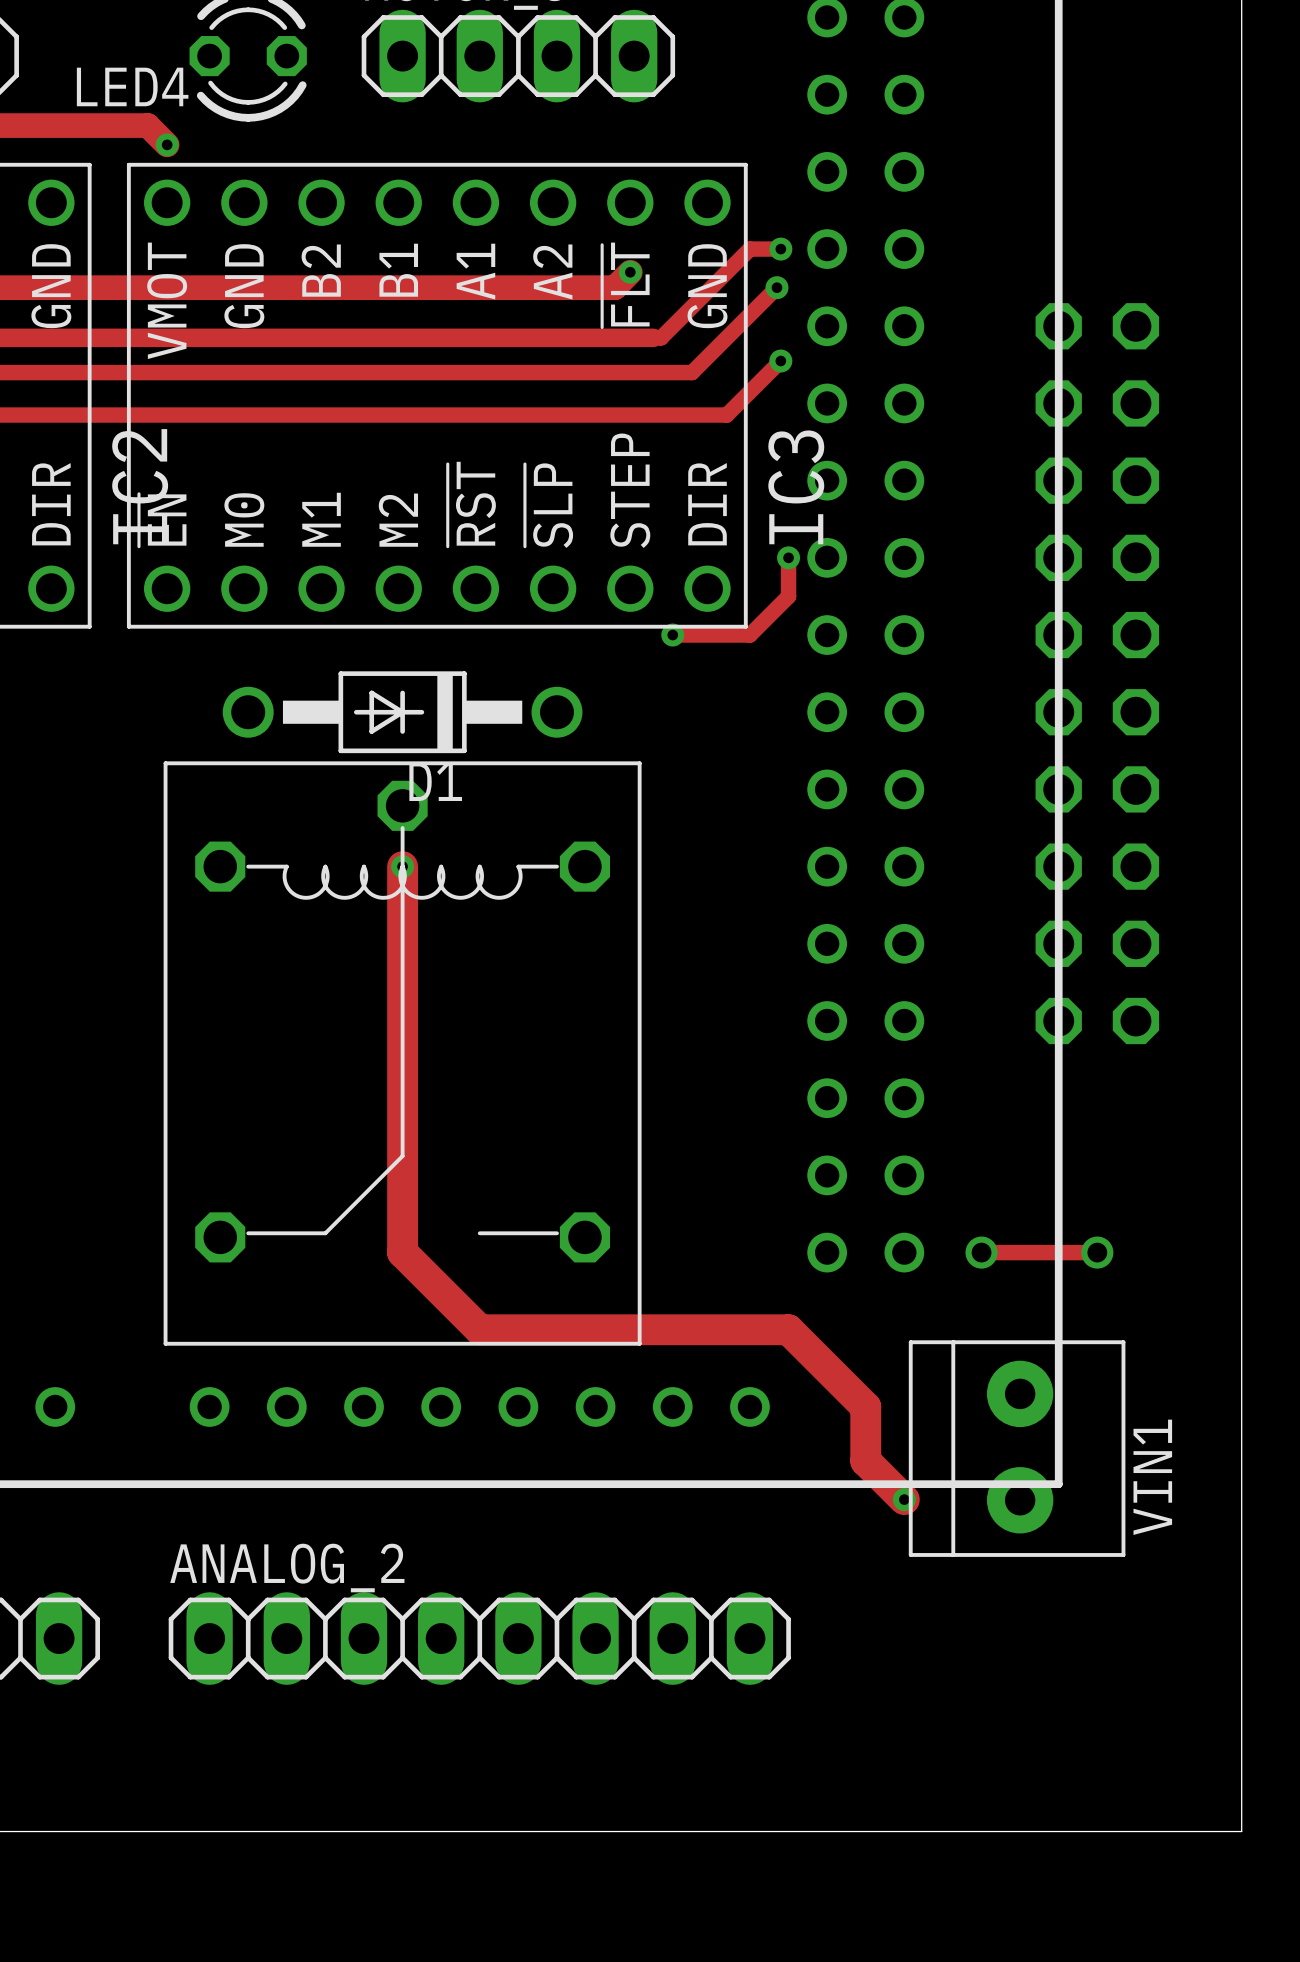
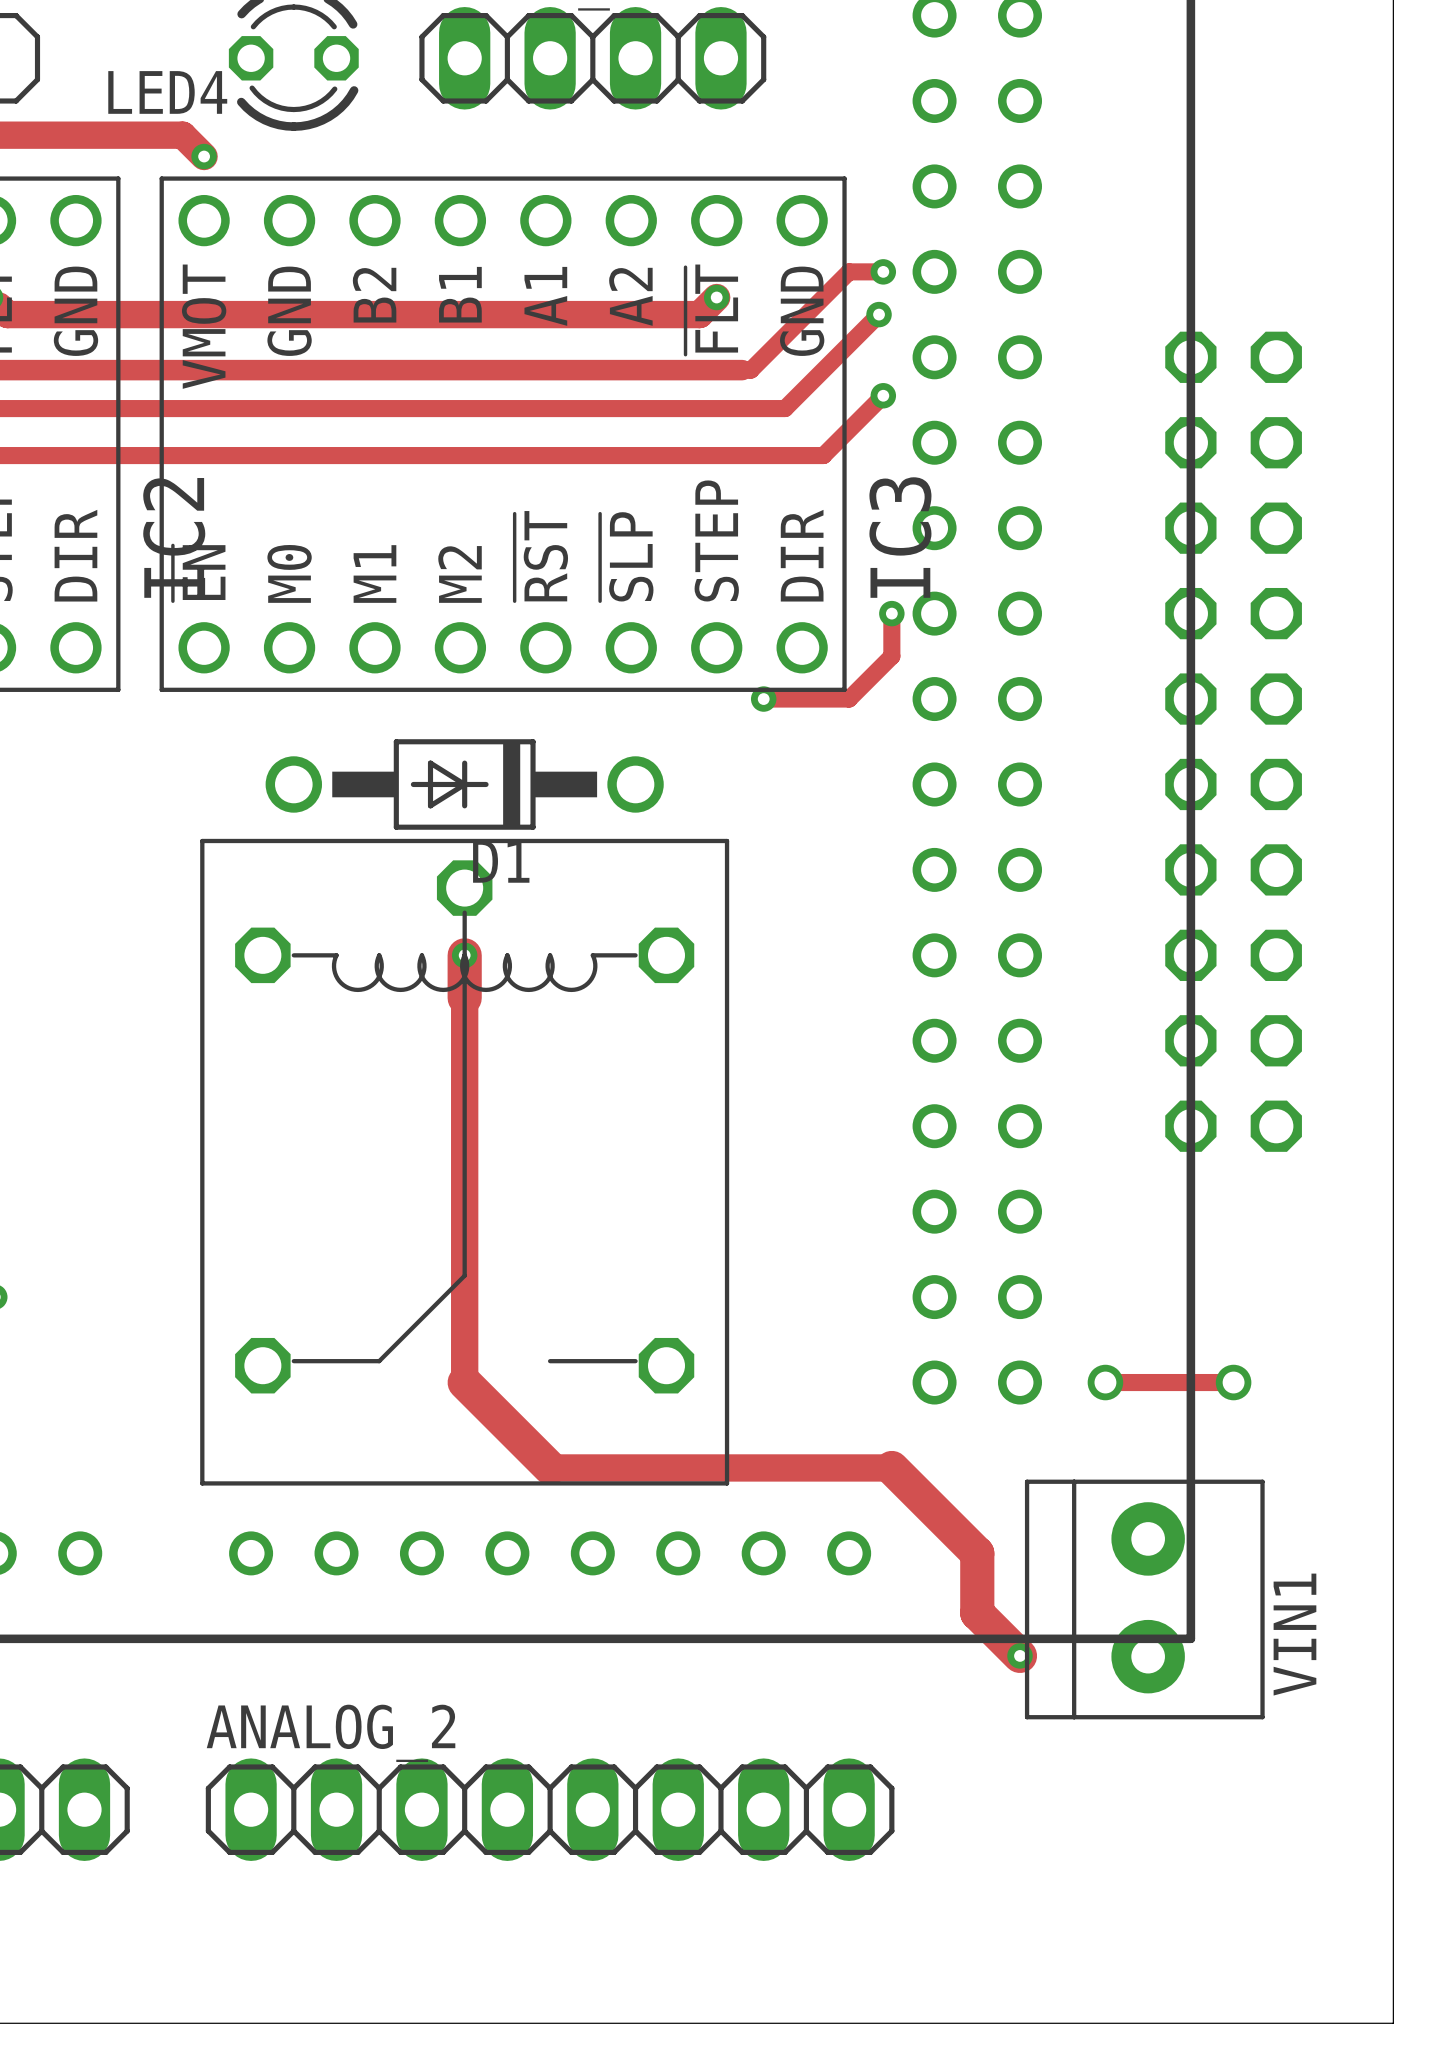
track width: thick (402, 905) (402, 1252) -> thin (464, 998) (464, 1382)
track width: thick (479, 1329) (788, 1329) -> thin (550, 1467) (891, 1467)

